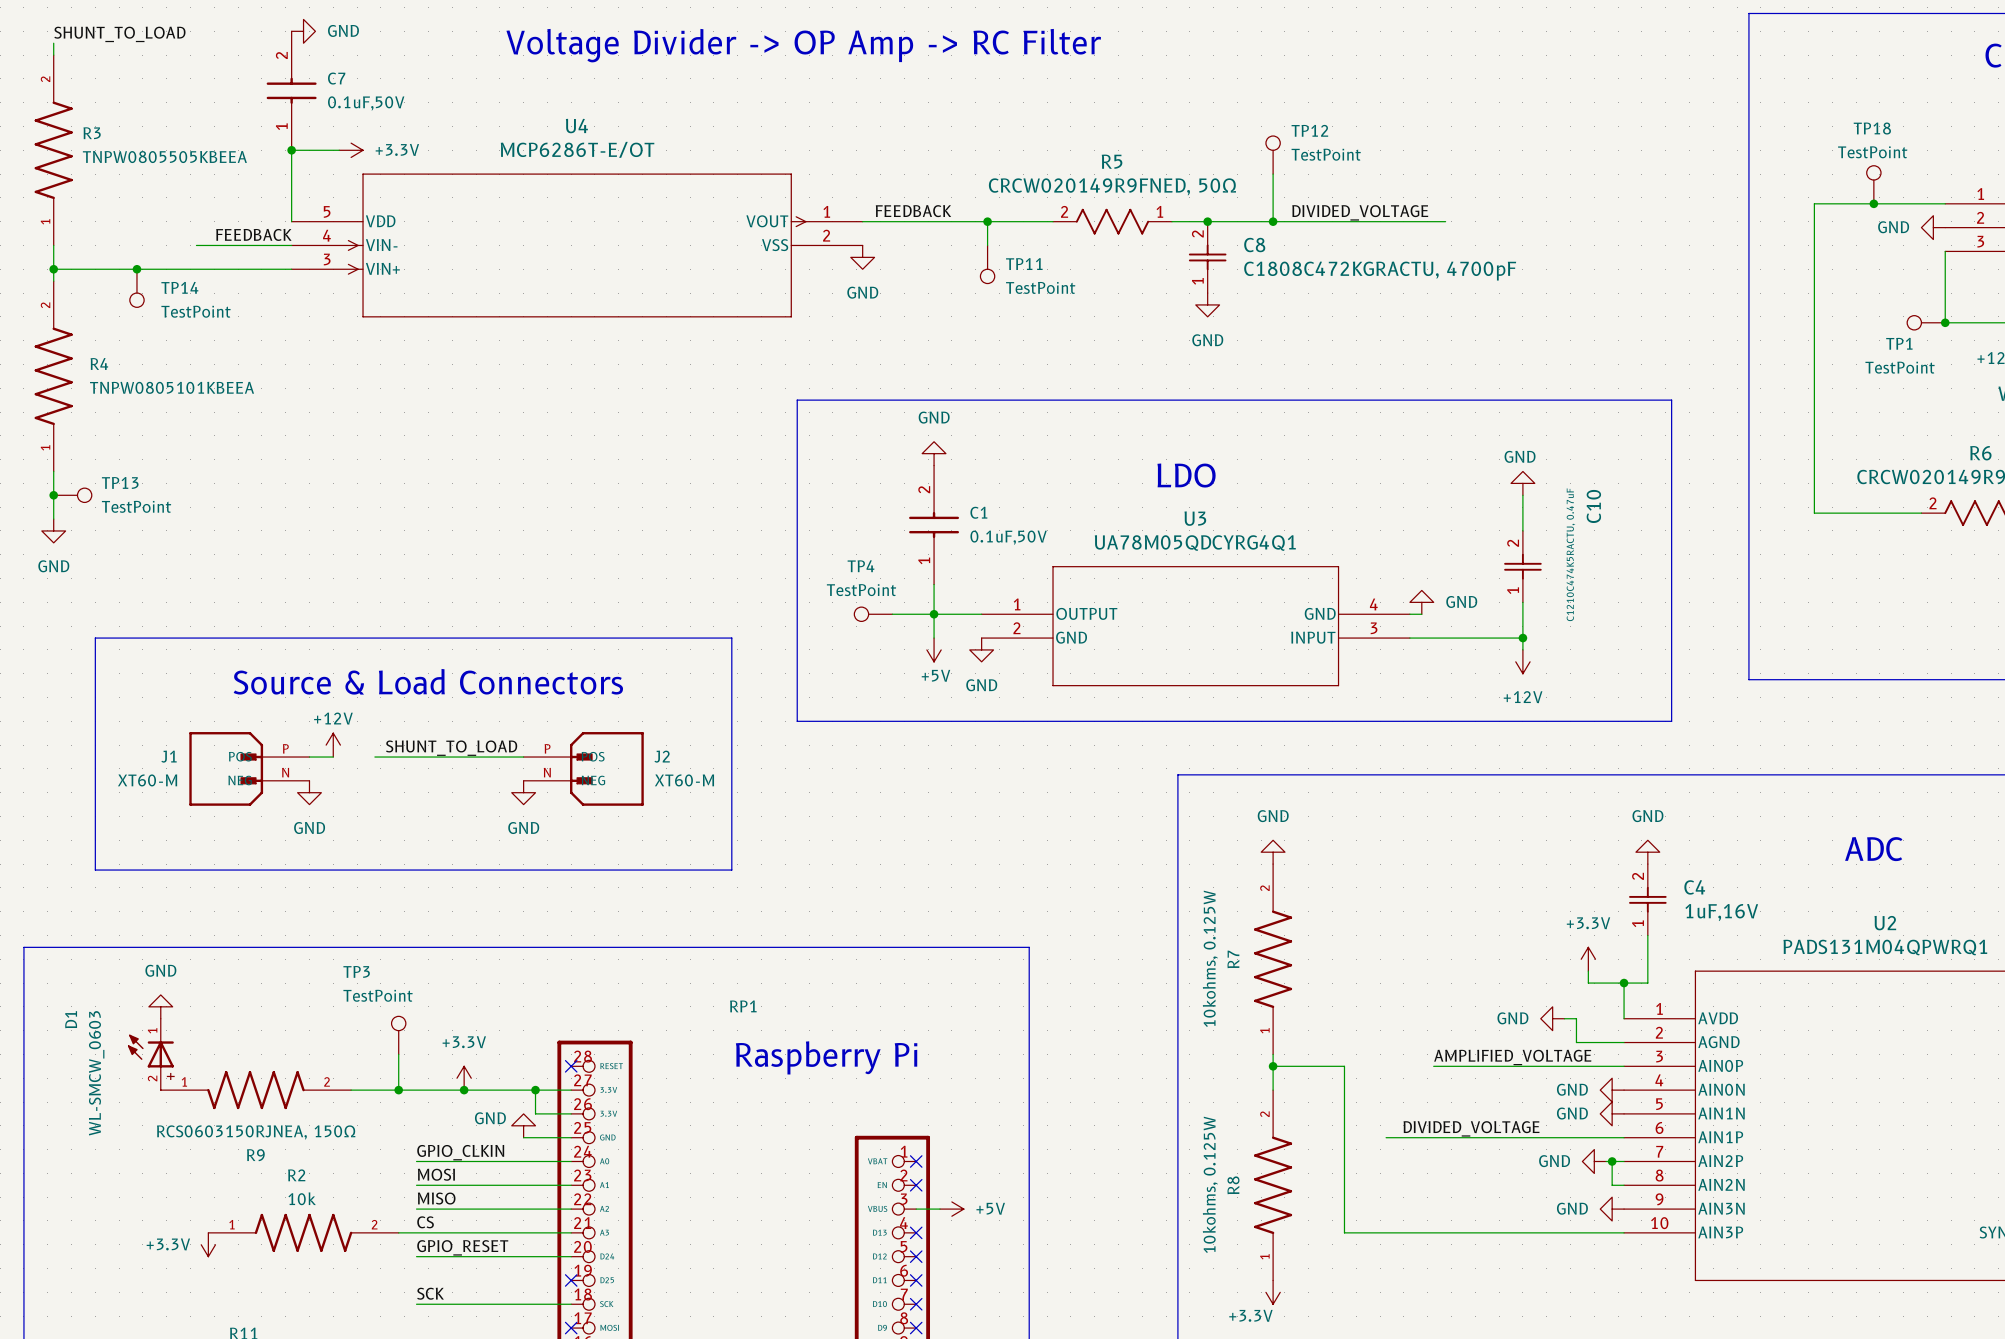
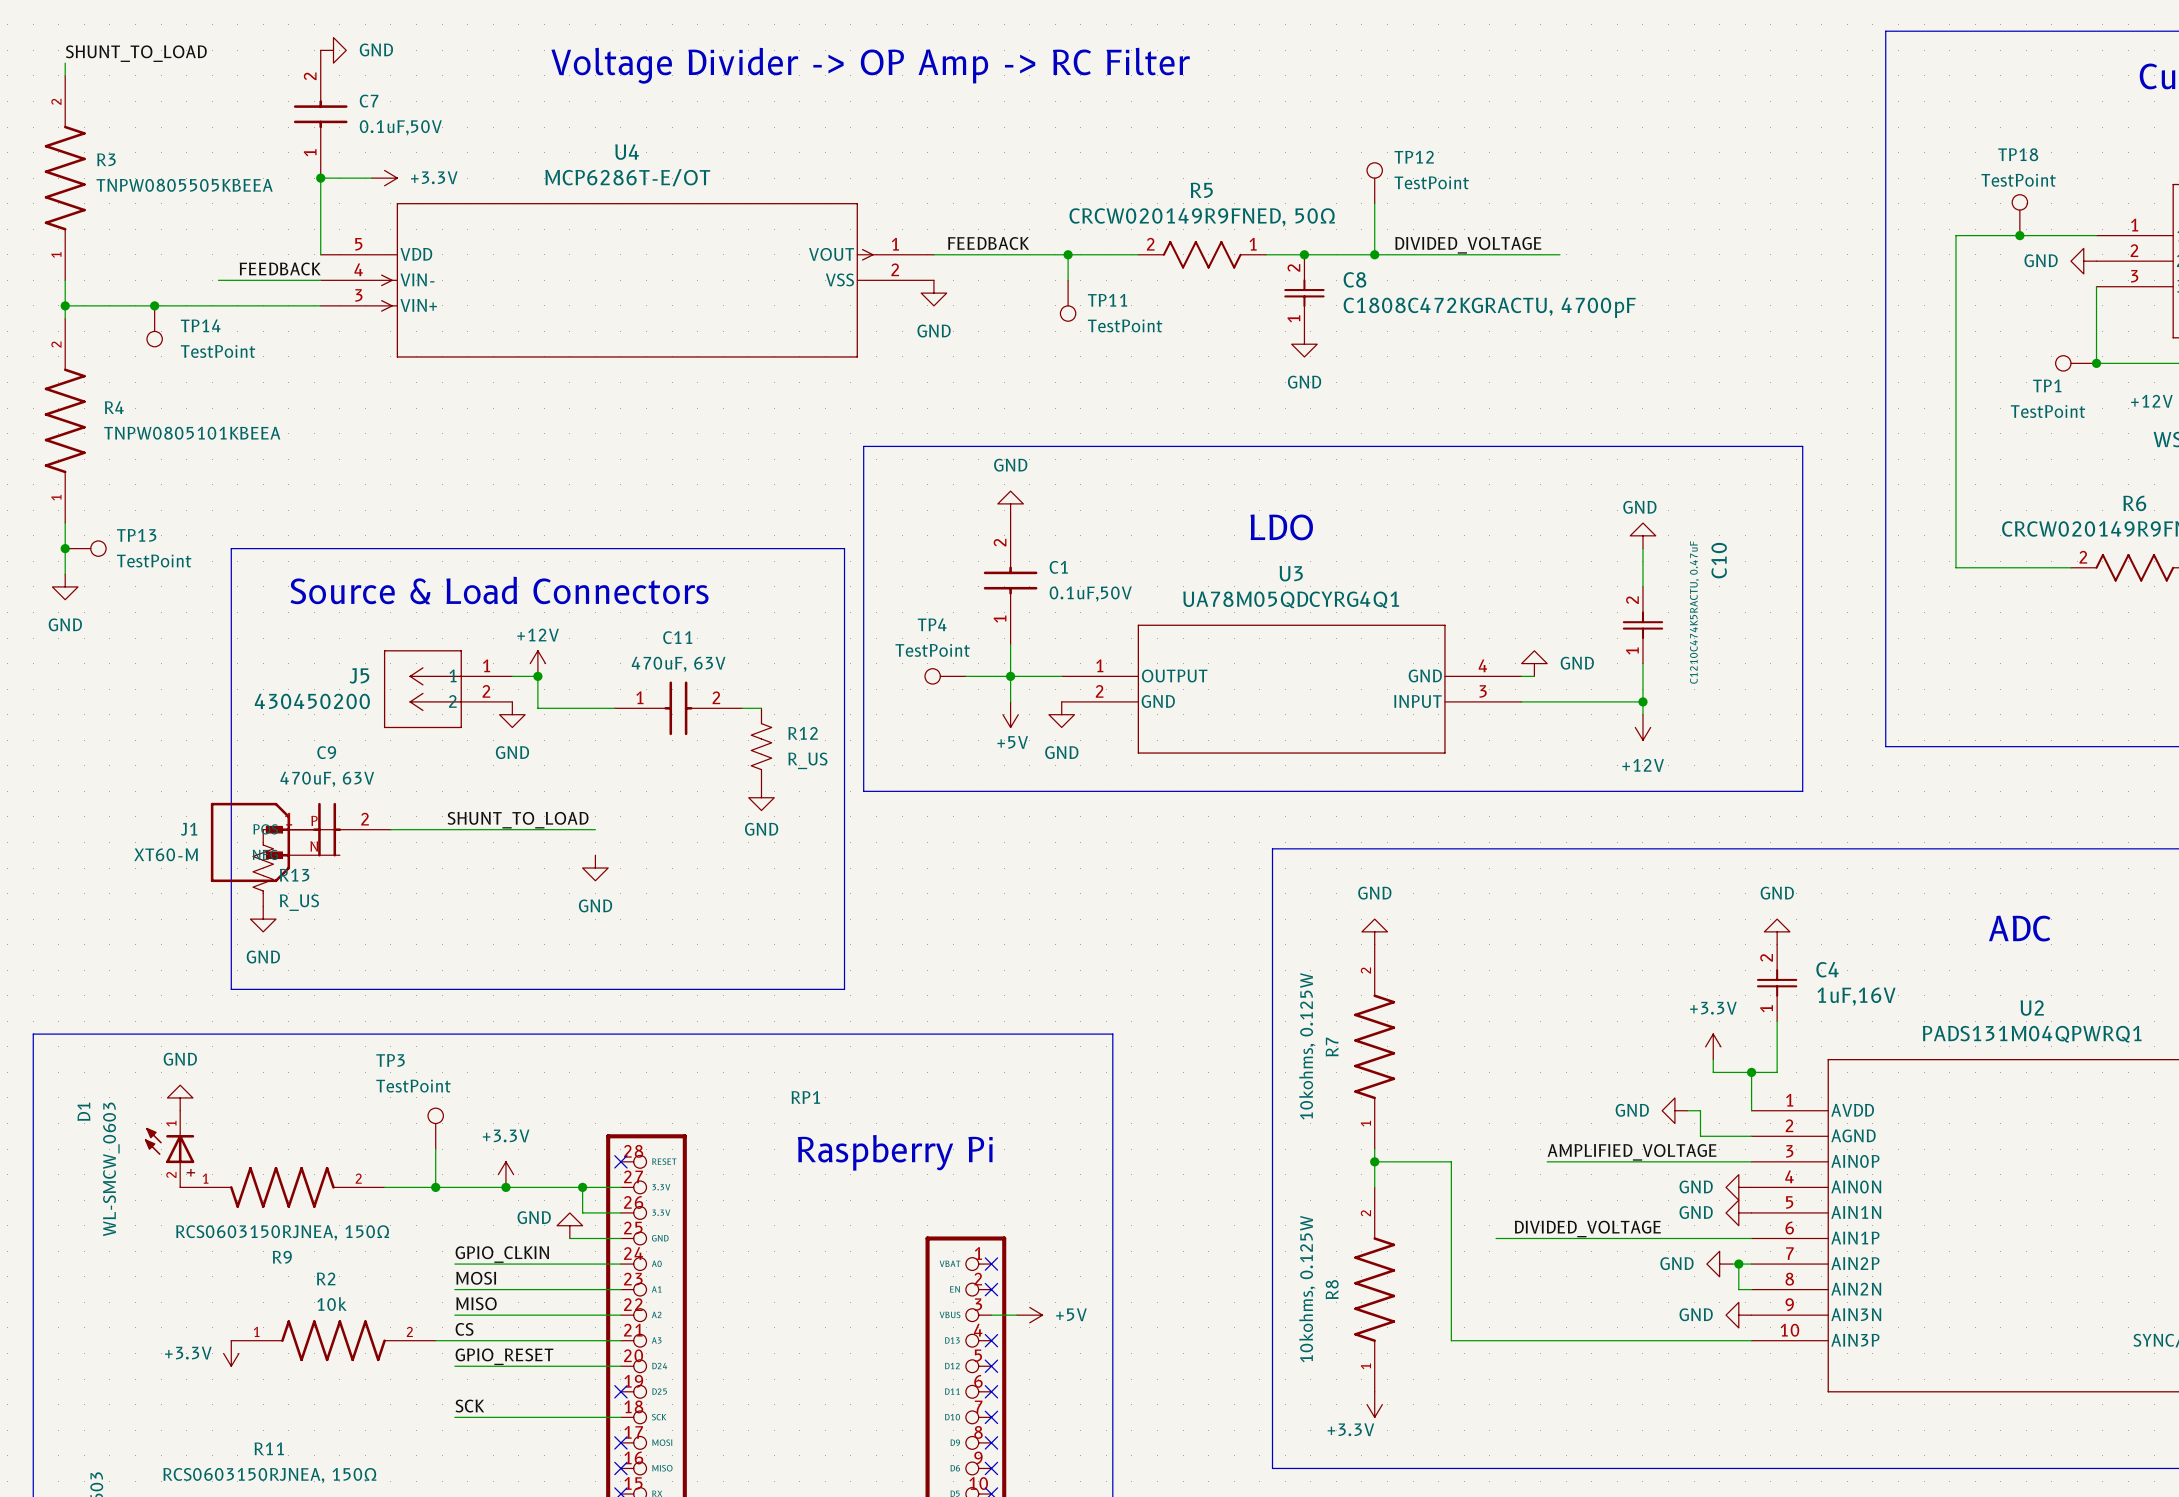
line: none -> (231, 548) (844, 548) (844, 989) (231, 989) (231, 548)
wire: none -> (512, 676) (537, 676) (537, 708) (614, 708)
junction: none -> (537, 676)
J5: none -> 430450200 (448, 689)
line: (95, 638) (731, 638) (731, 870) (95, 870) (95, 638) -> none
C11: none -> 470uF, 63V (678, 708)
wire: none -> (742, 708) (761, 708)
power symbol: none -> GND (512, 714)
R12: none -> R_US (761, 746)
text position: Source & Load Connectors (428, 681) -> Source & Load Connectors (499, 590)
power symbol: none -> GND (761, 797)
power symbol position: +12V (333, 745) -> +12V (537, 663)
label position: SHUNT_TO_LOAD (451, 748) -> SHUNT_TO_LOAD (518, 820)
C9: none -> 470uF, 63V (327, 829)
wire: none -> (390, 829) (410, 829)
J2: XT60-M (583, 768) -> none
R13: none -> R_US (263, 868)
power symbol position: GND (309, 792) -> GND (263, 919)
power symbol position: GND (523, 792) -> GND (595, 868)

